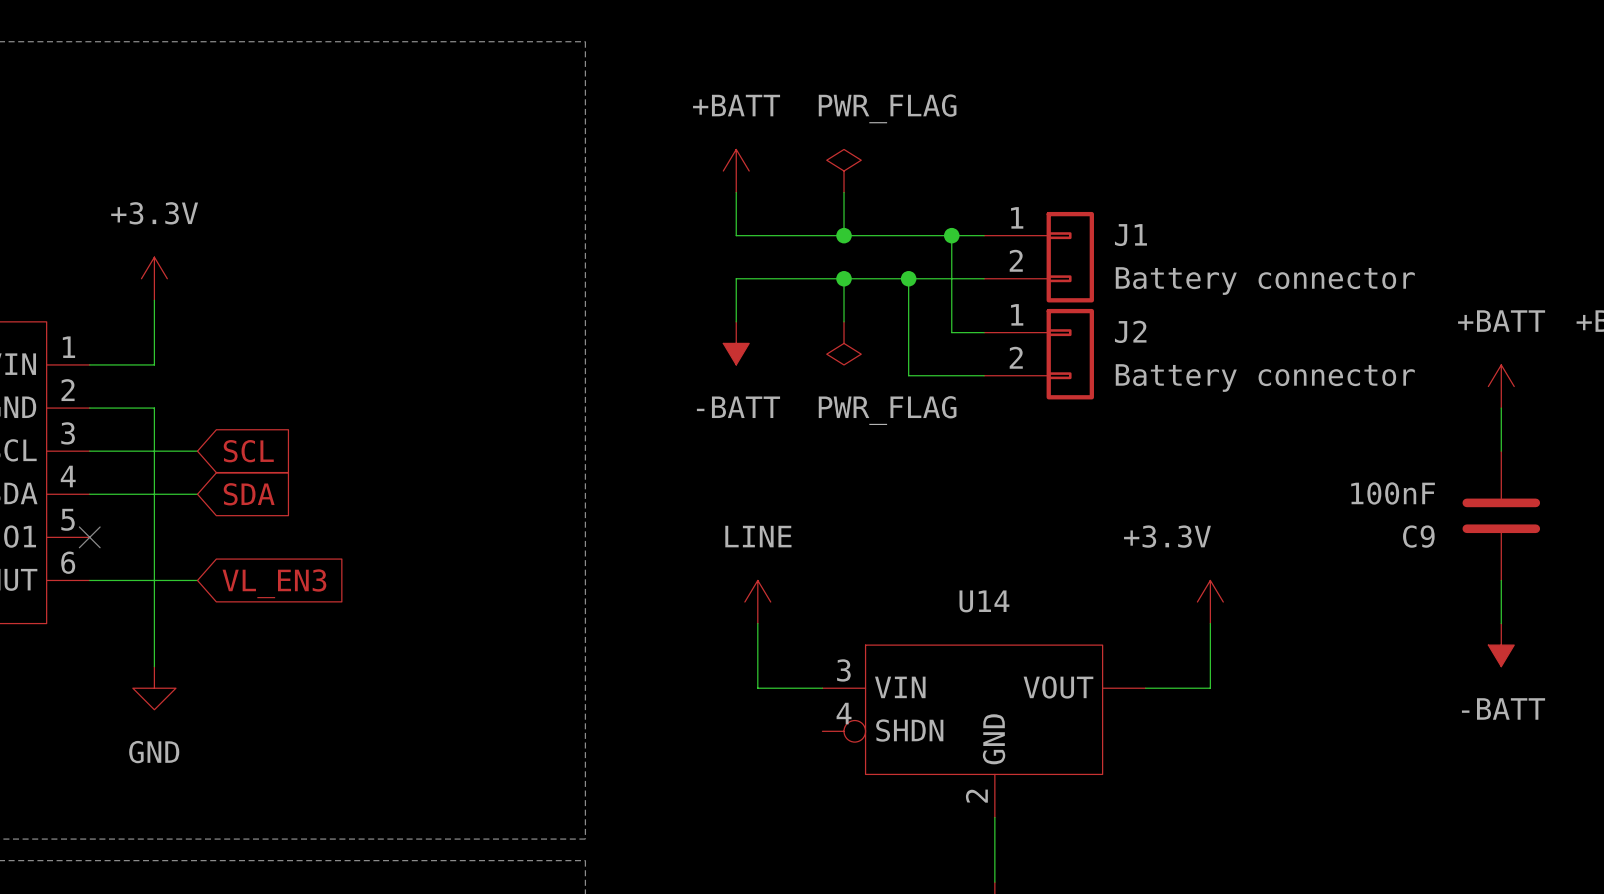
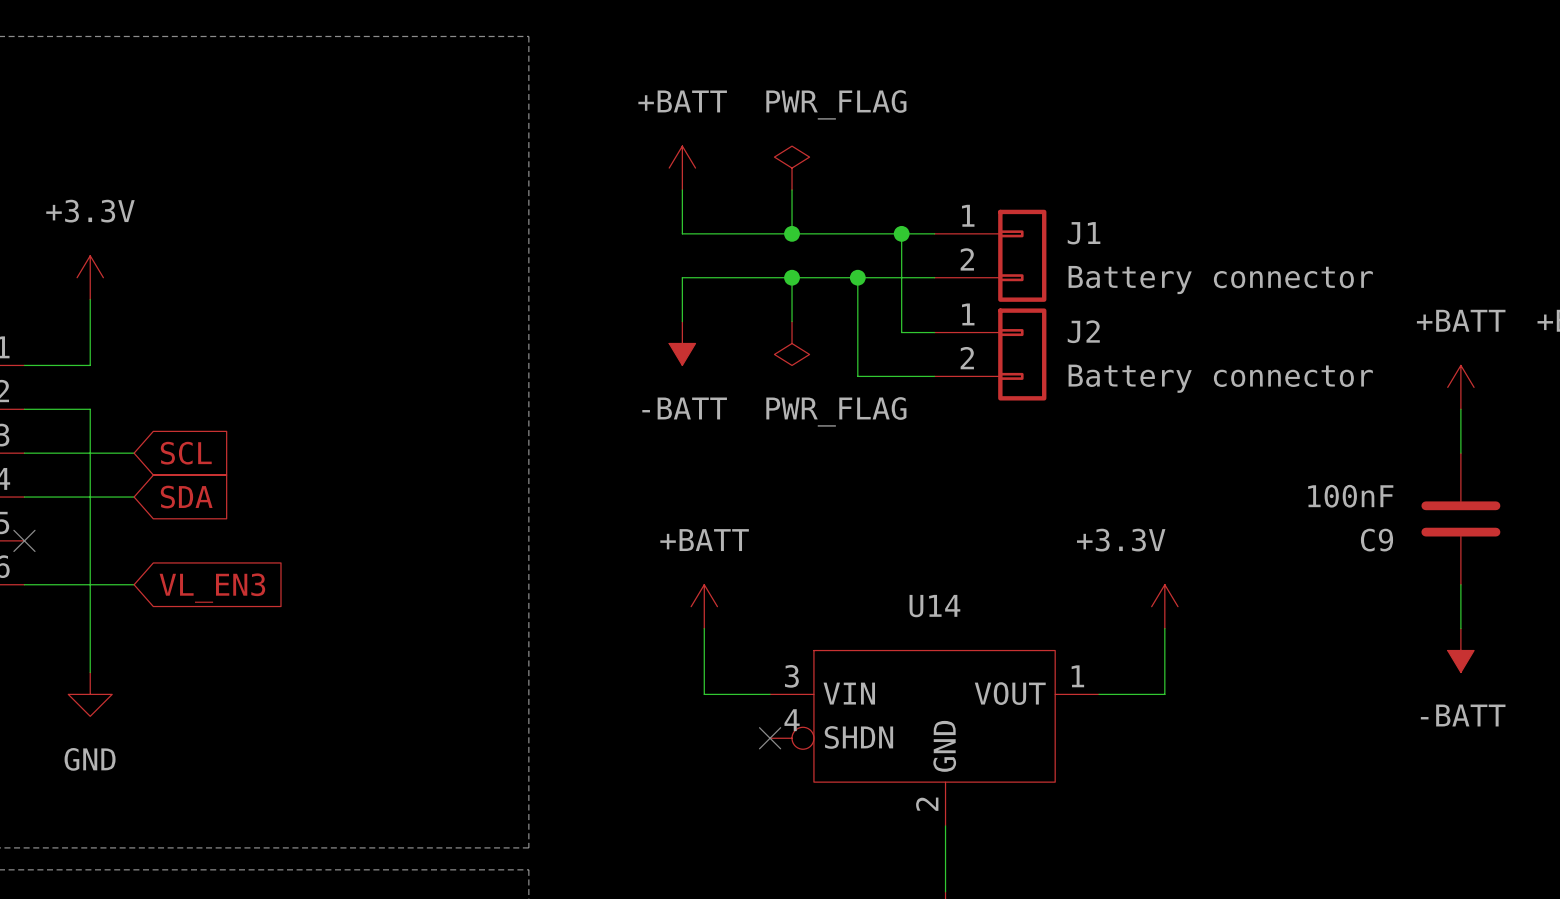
power symbol: LINE (757, 602) -> +BATT (704, 606)
U14 pin number: none -> 1 (1077, 676)
no-connect mark: none -> (770, 738)

